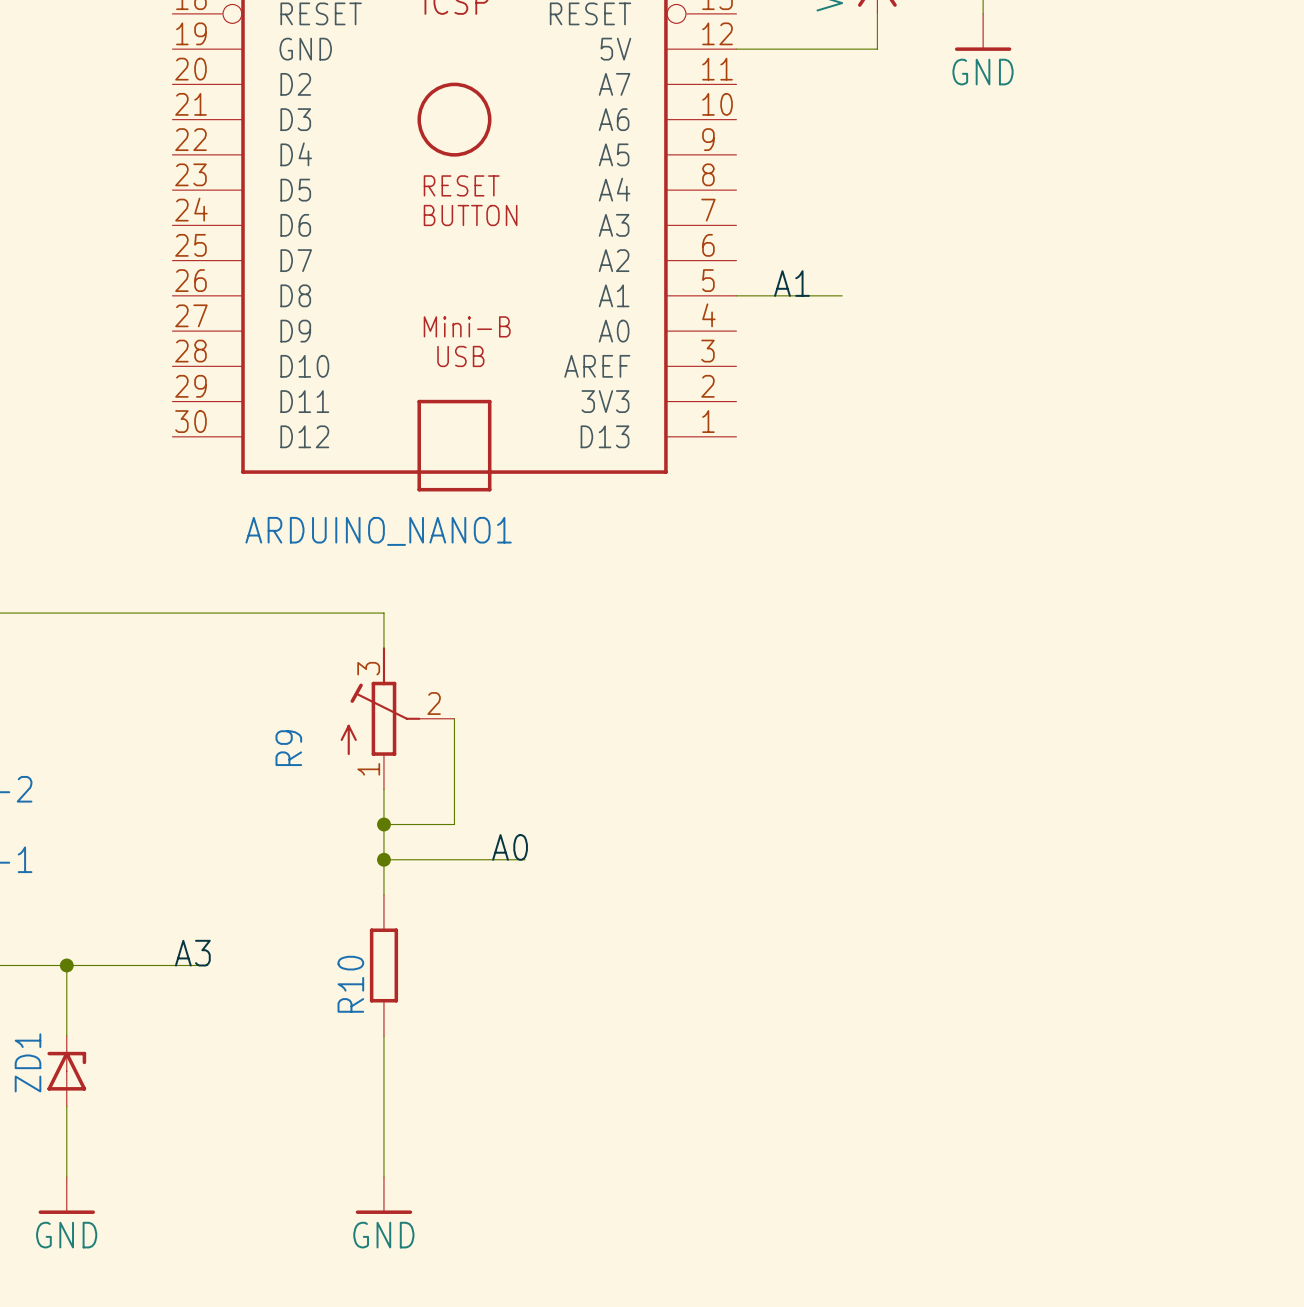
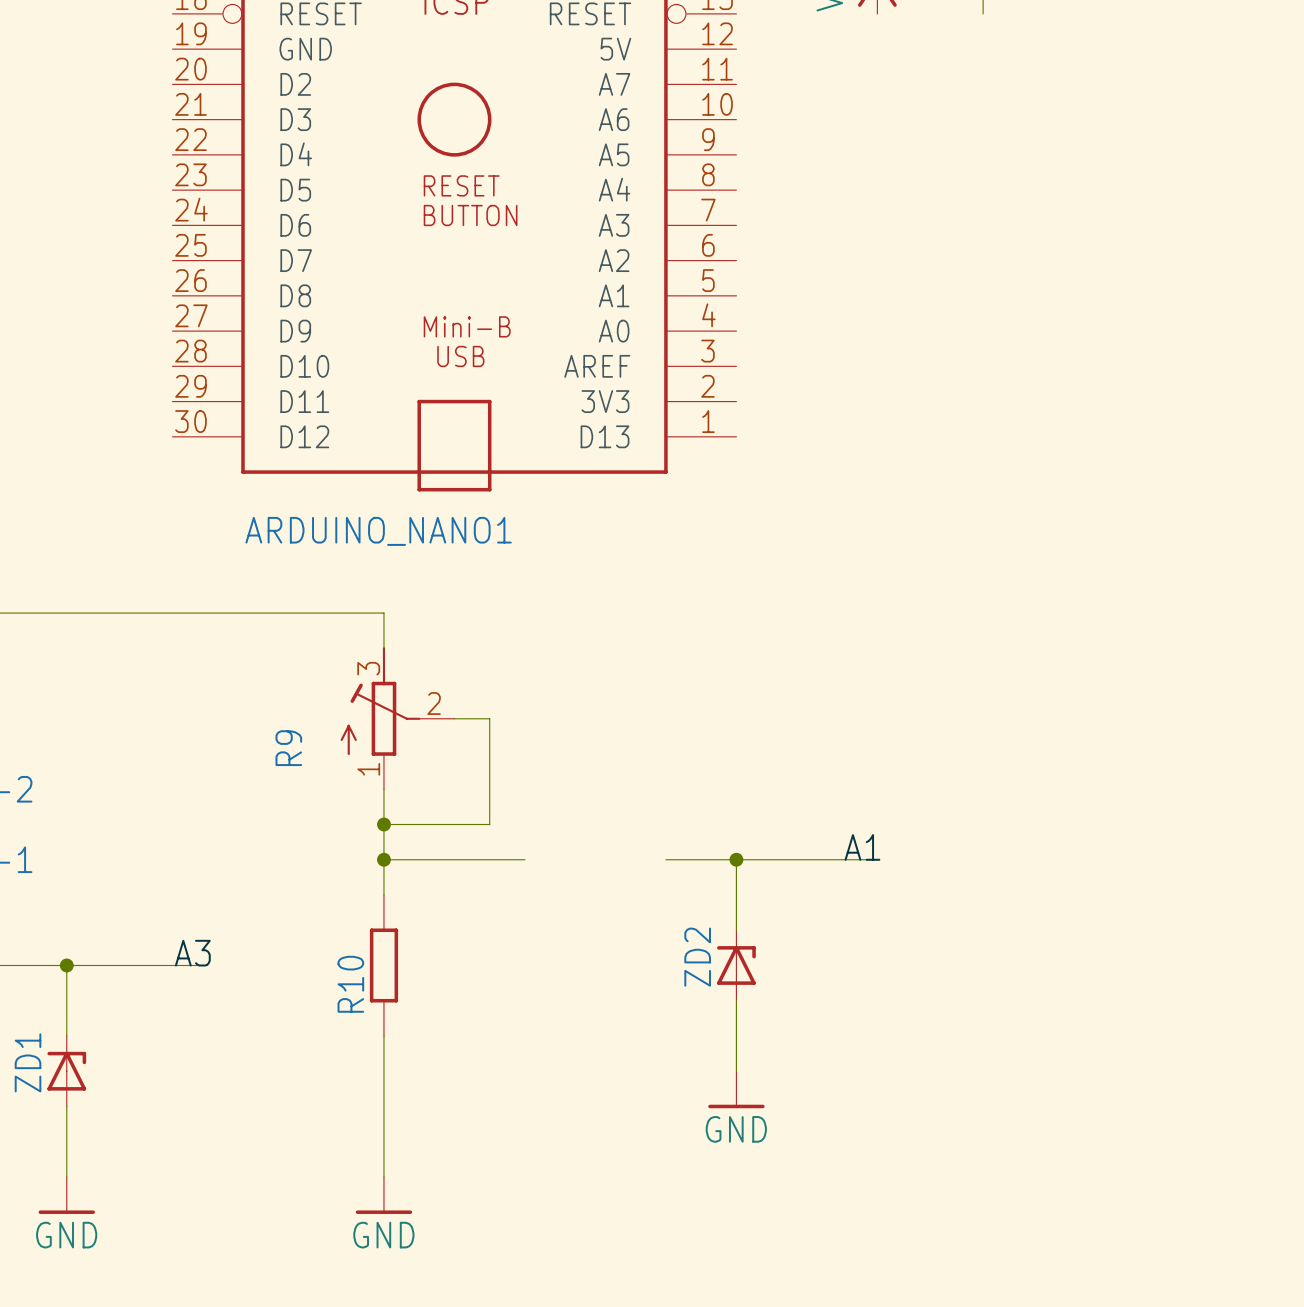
wire: (877, 13) (877, 49) (736, 49) -> none
power symbol: GND (983, 32) -> none
label: A1 (791, 283) -> none
wire: (736, 295) (842, 295) -> none
wire: (454, 718) (454, 824) -> (454, 718) (489, 718) (489, 824) (454, 824)
label: A0 (510, 847) -> none
label: none -> A1 (862, 847)
wire: none -> (665, 859) (877, 859)
wire: none -> (736, 859) (736, 930)
junction: none -> (736, 859)
ZD2: none -> (736, 965)
wire: none -> (736, 1000) (736, 1071)
power symbol: none -> GND (736, 1089)

